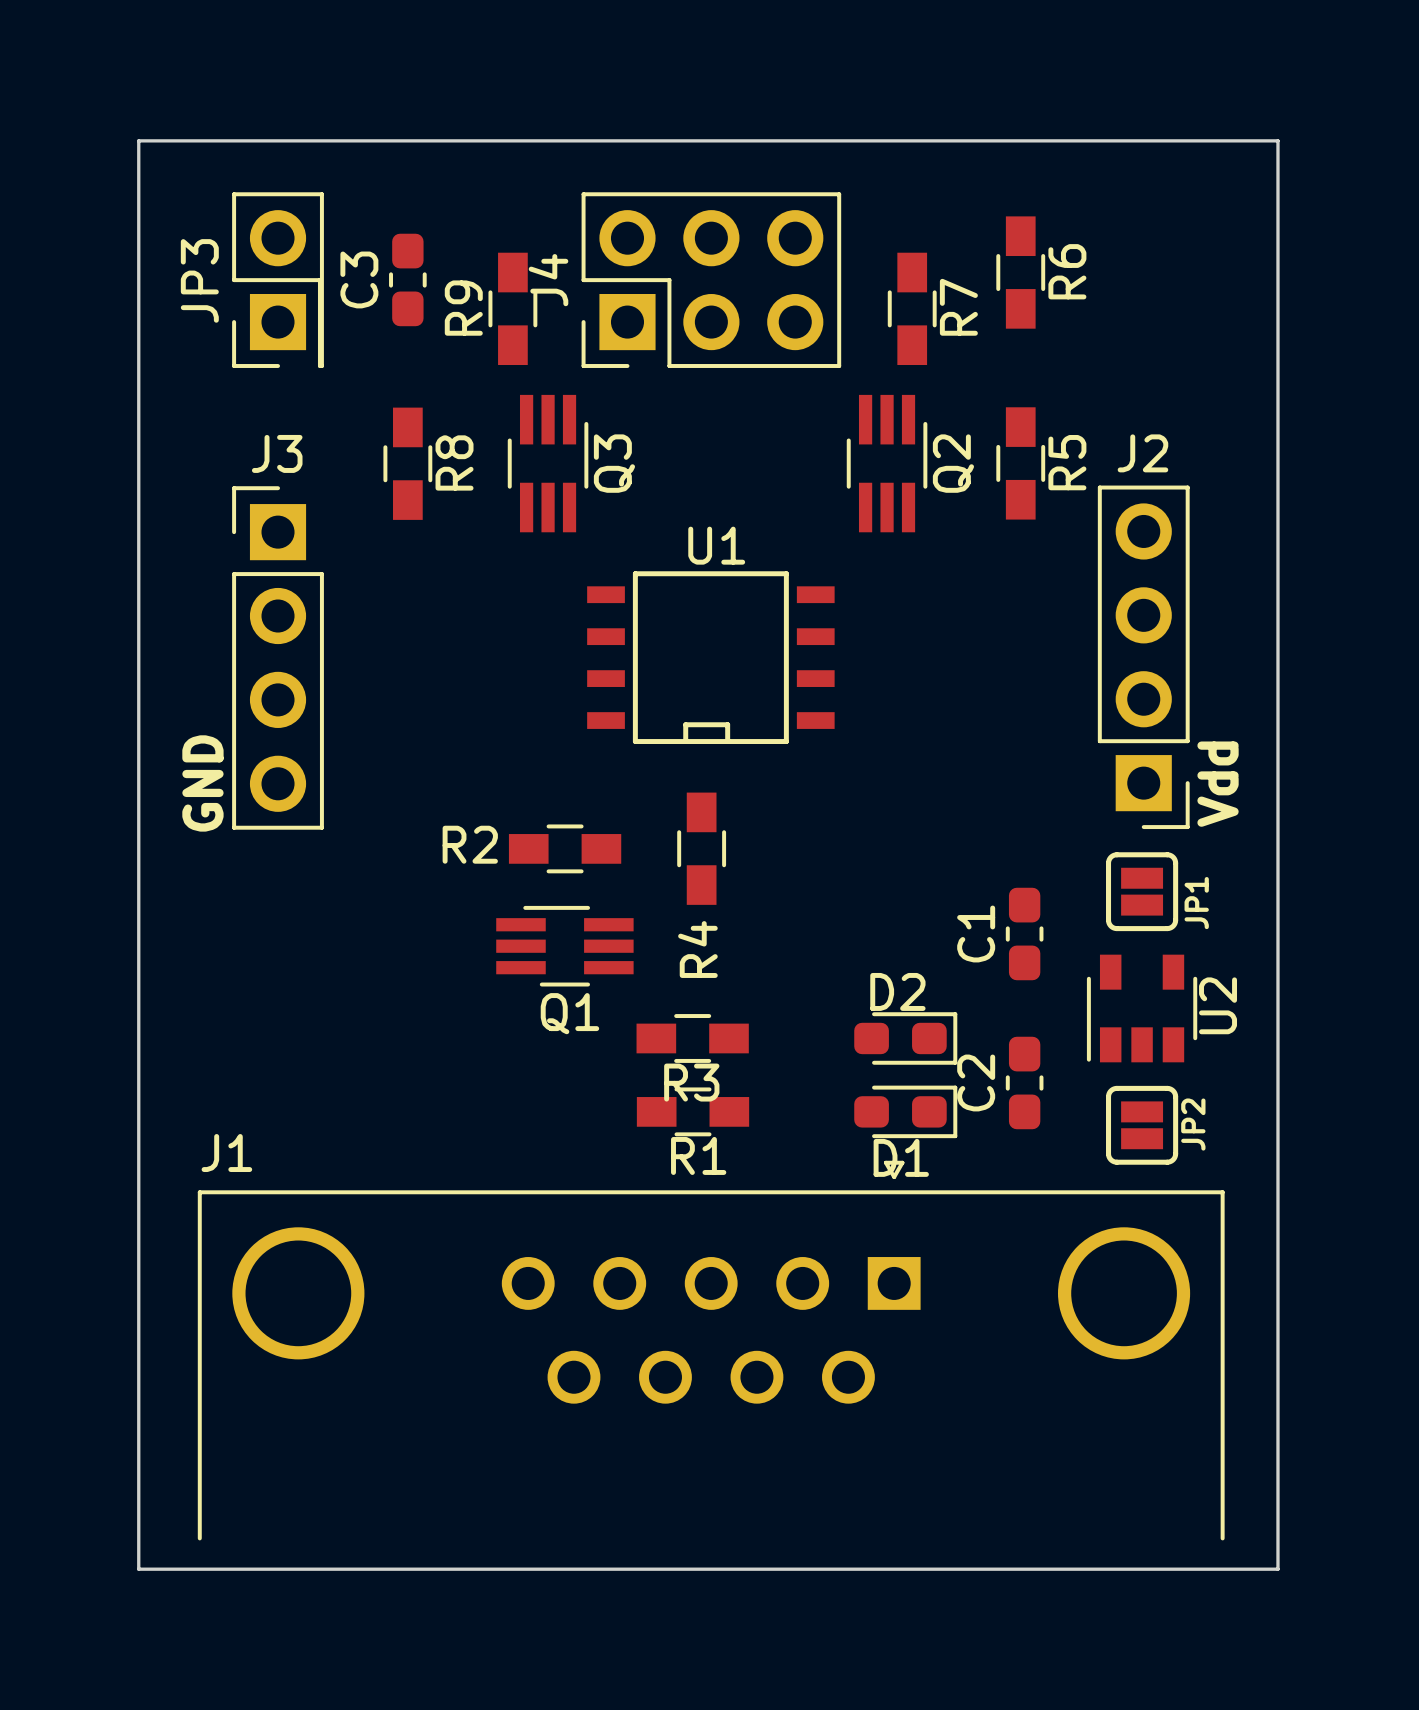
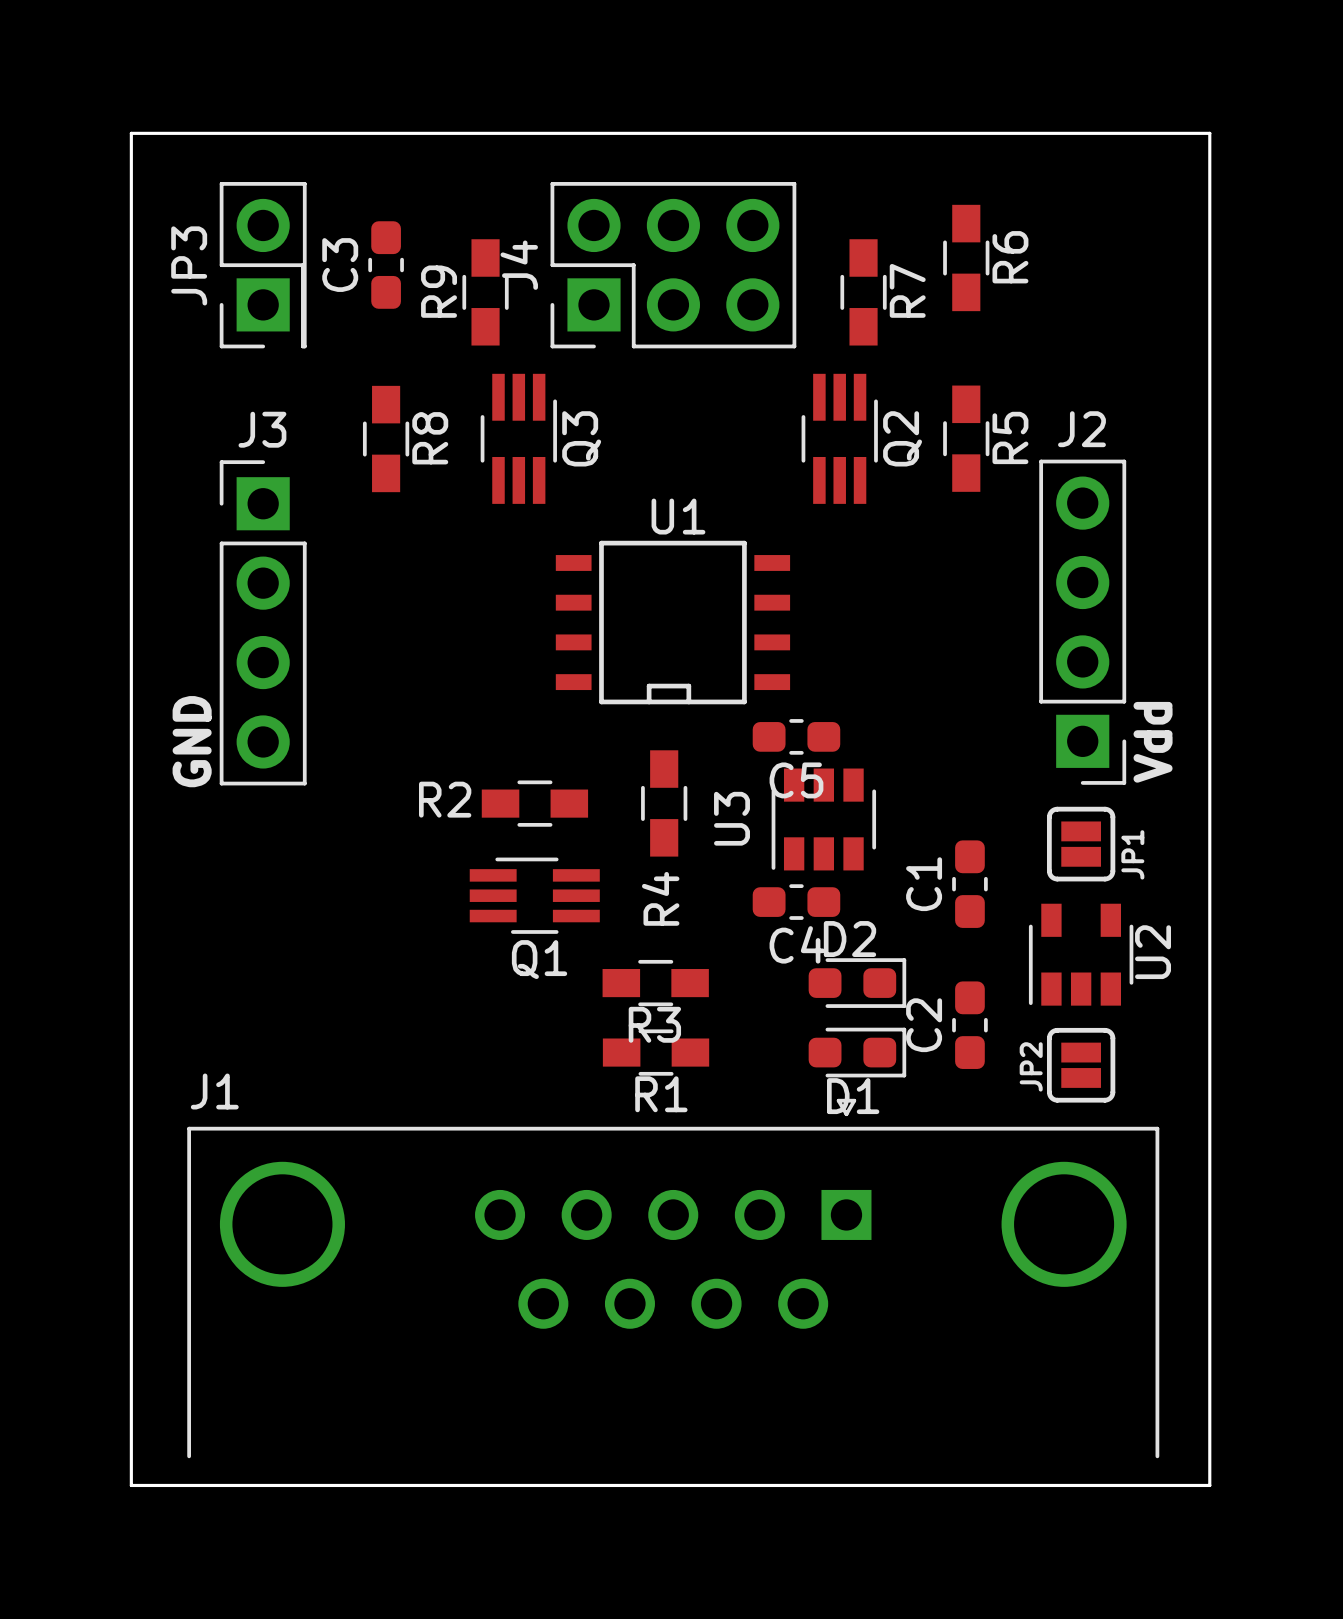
C5: none -> (796, 736)
U3: none -> (823, 819)
C4: none -> (796, 902)
JP2 name position: JP2 (1193, 1124) -> JP2 (1031, 1066)

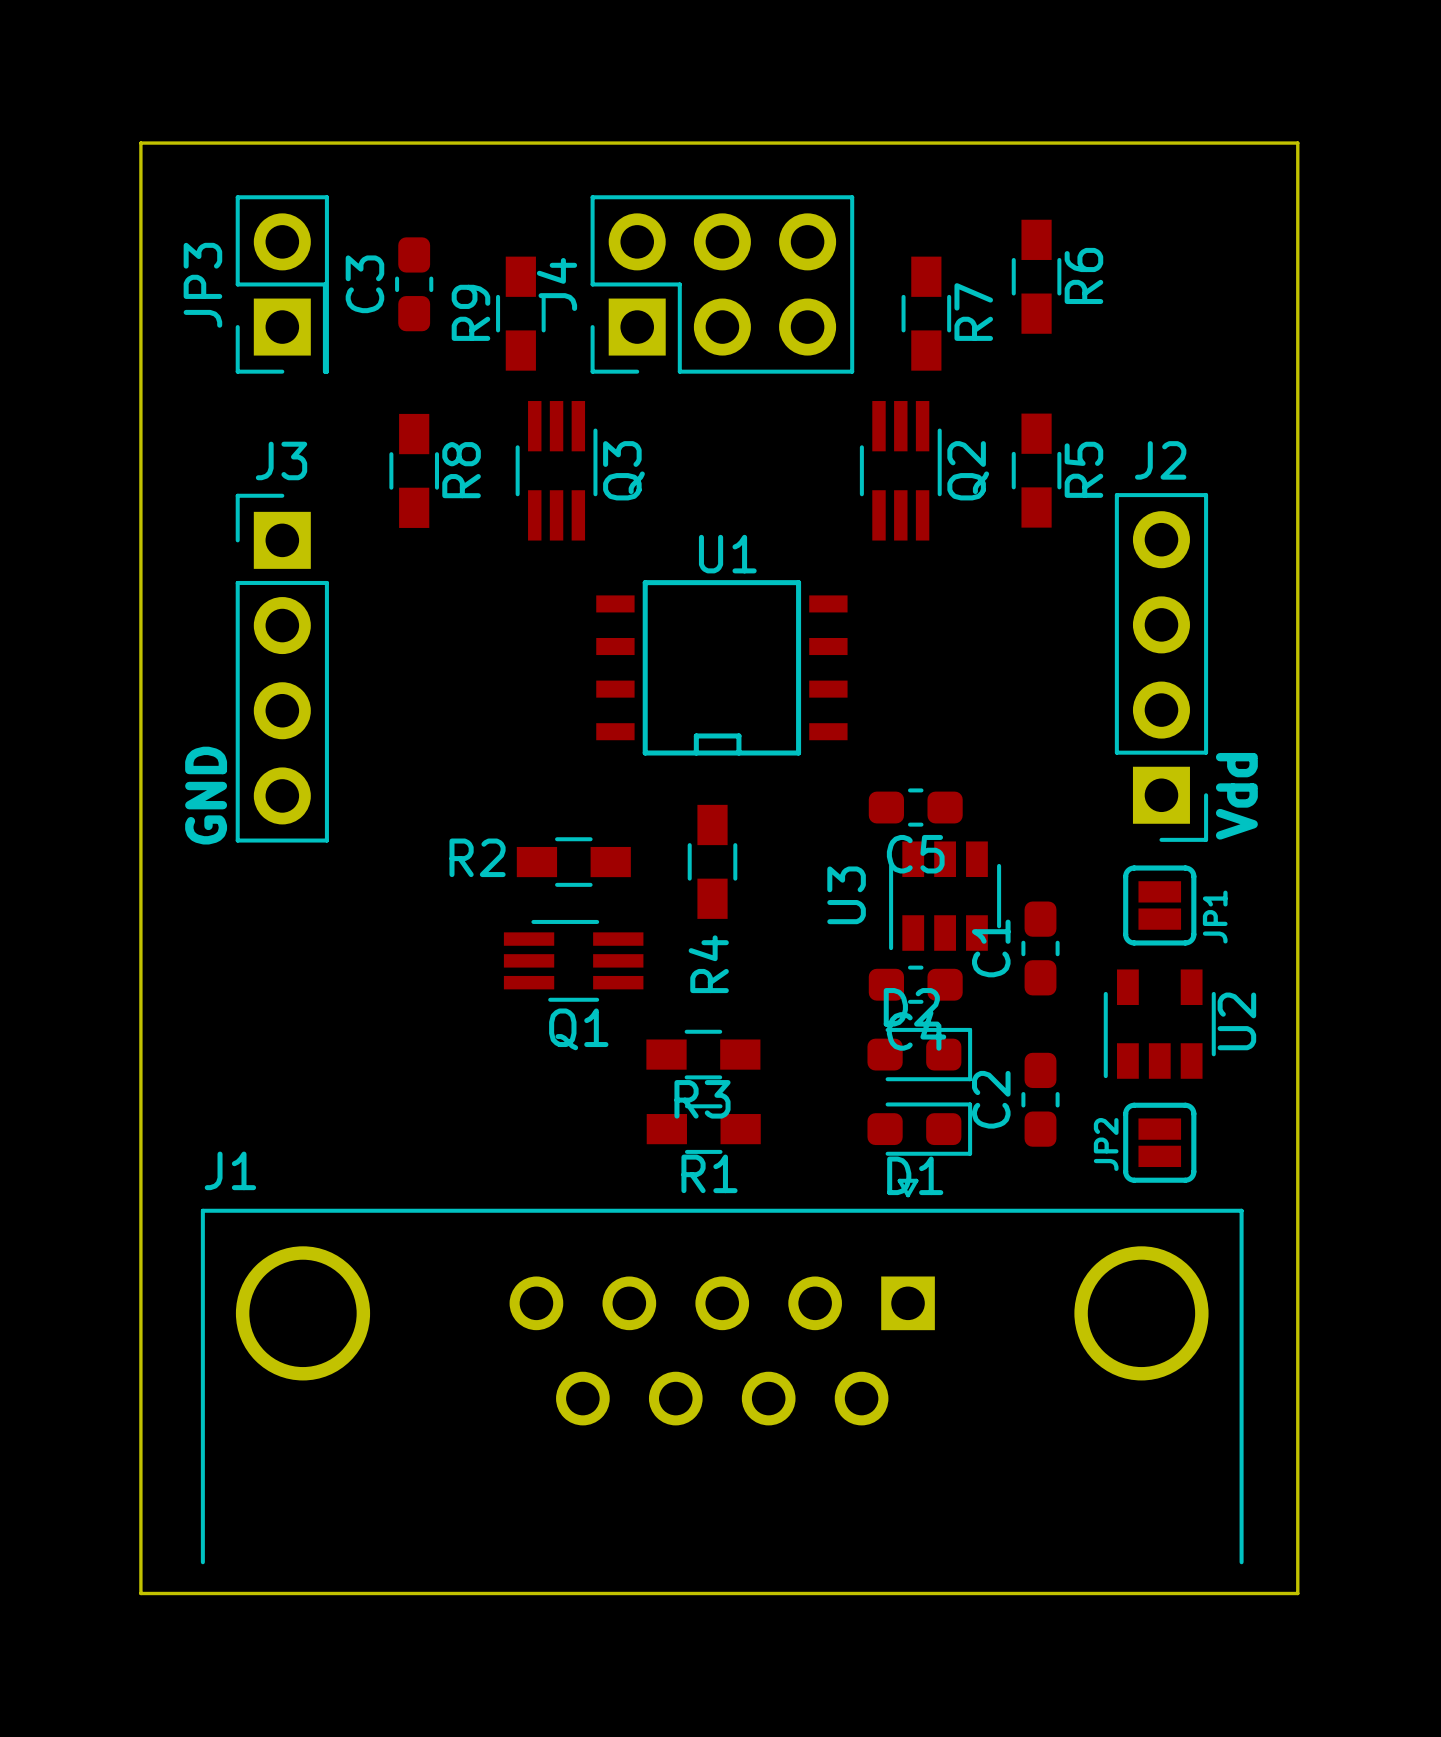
C5 position: (796, 736) -> (915, 807)
U3 position: (823, 819) -> (945, 896)
C4 position: (796, 902) -> (915, 984)

